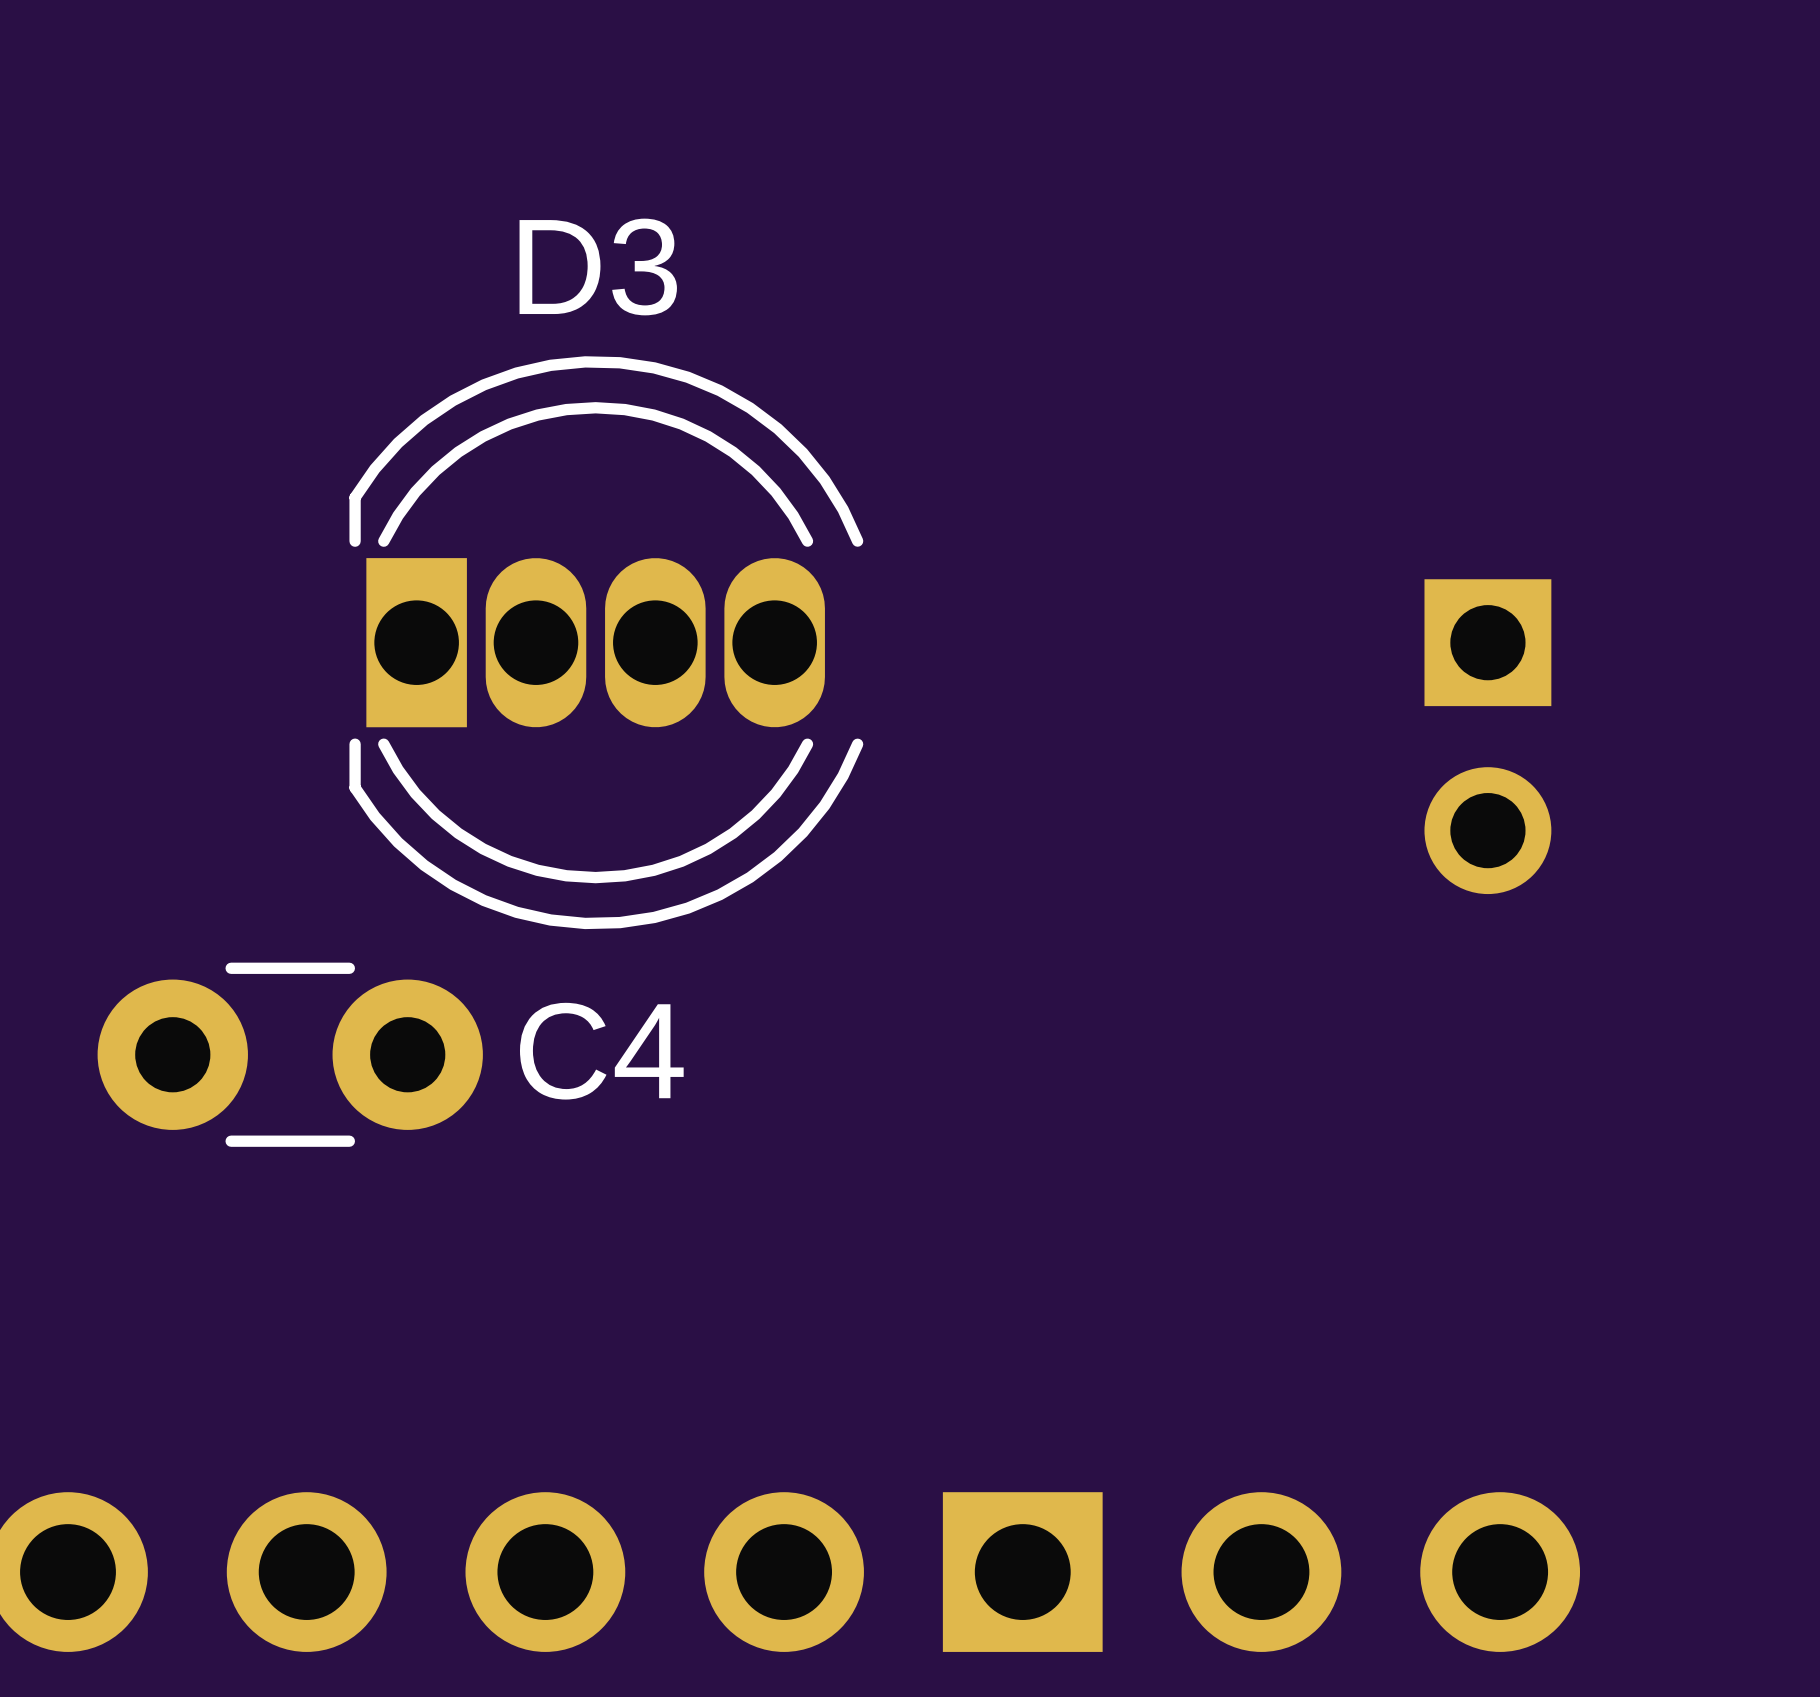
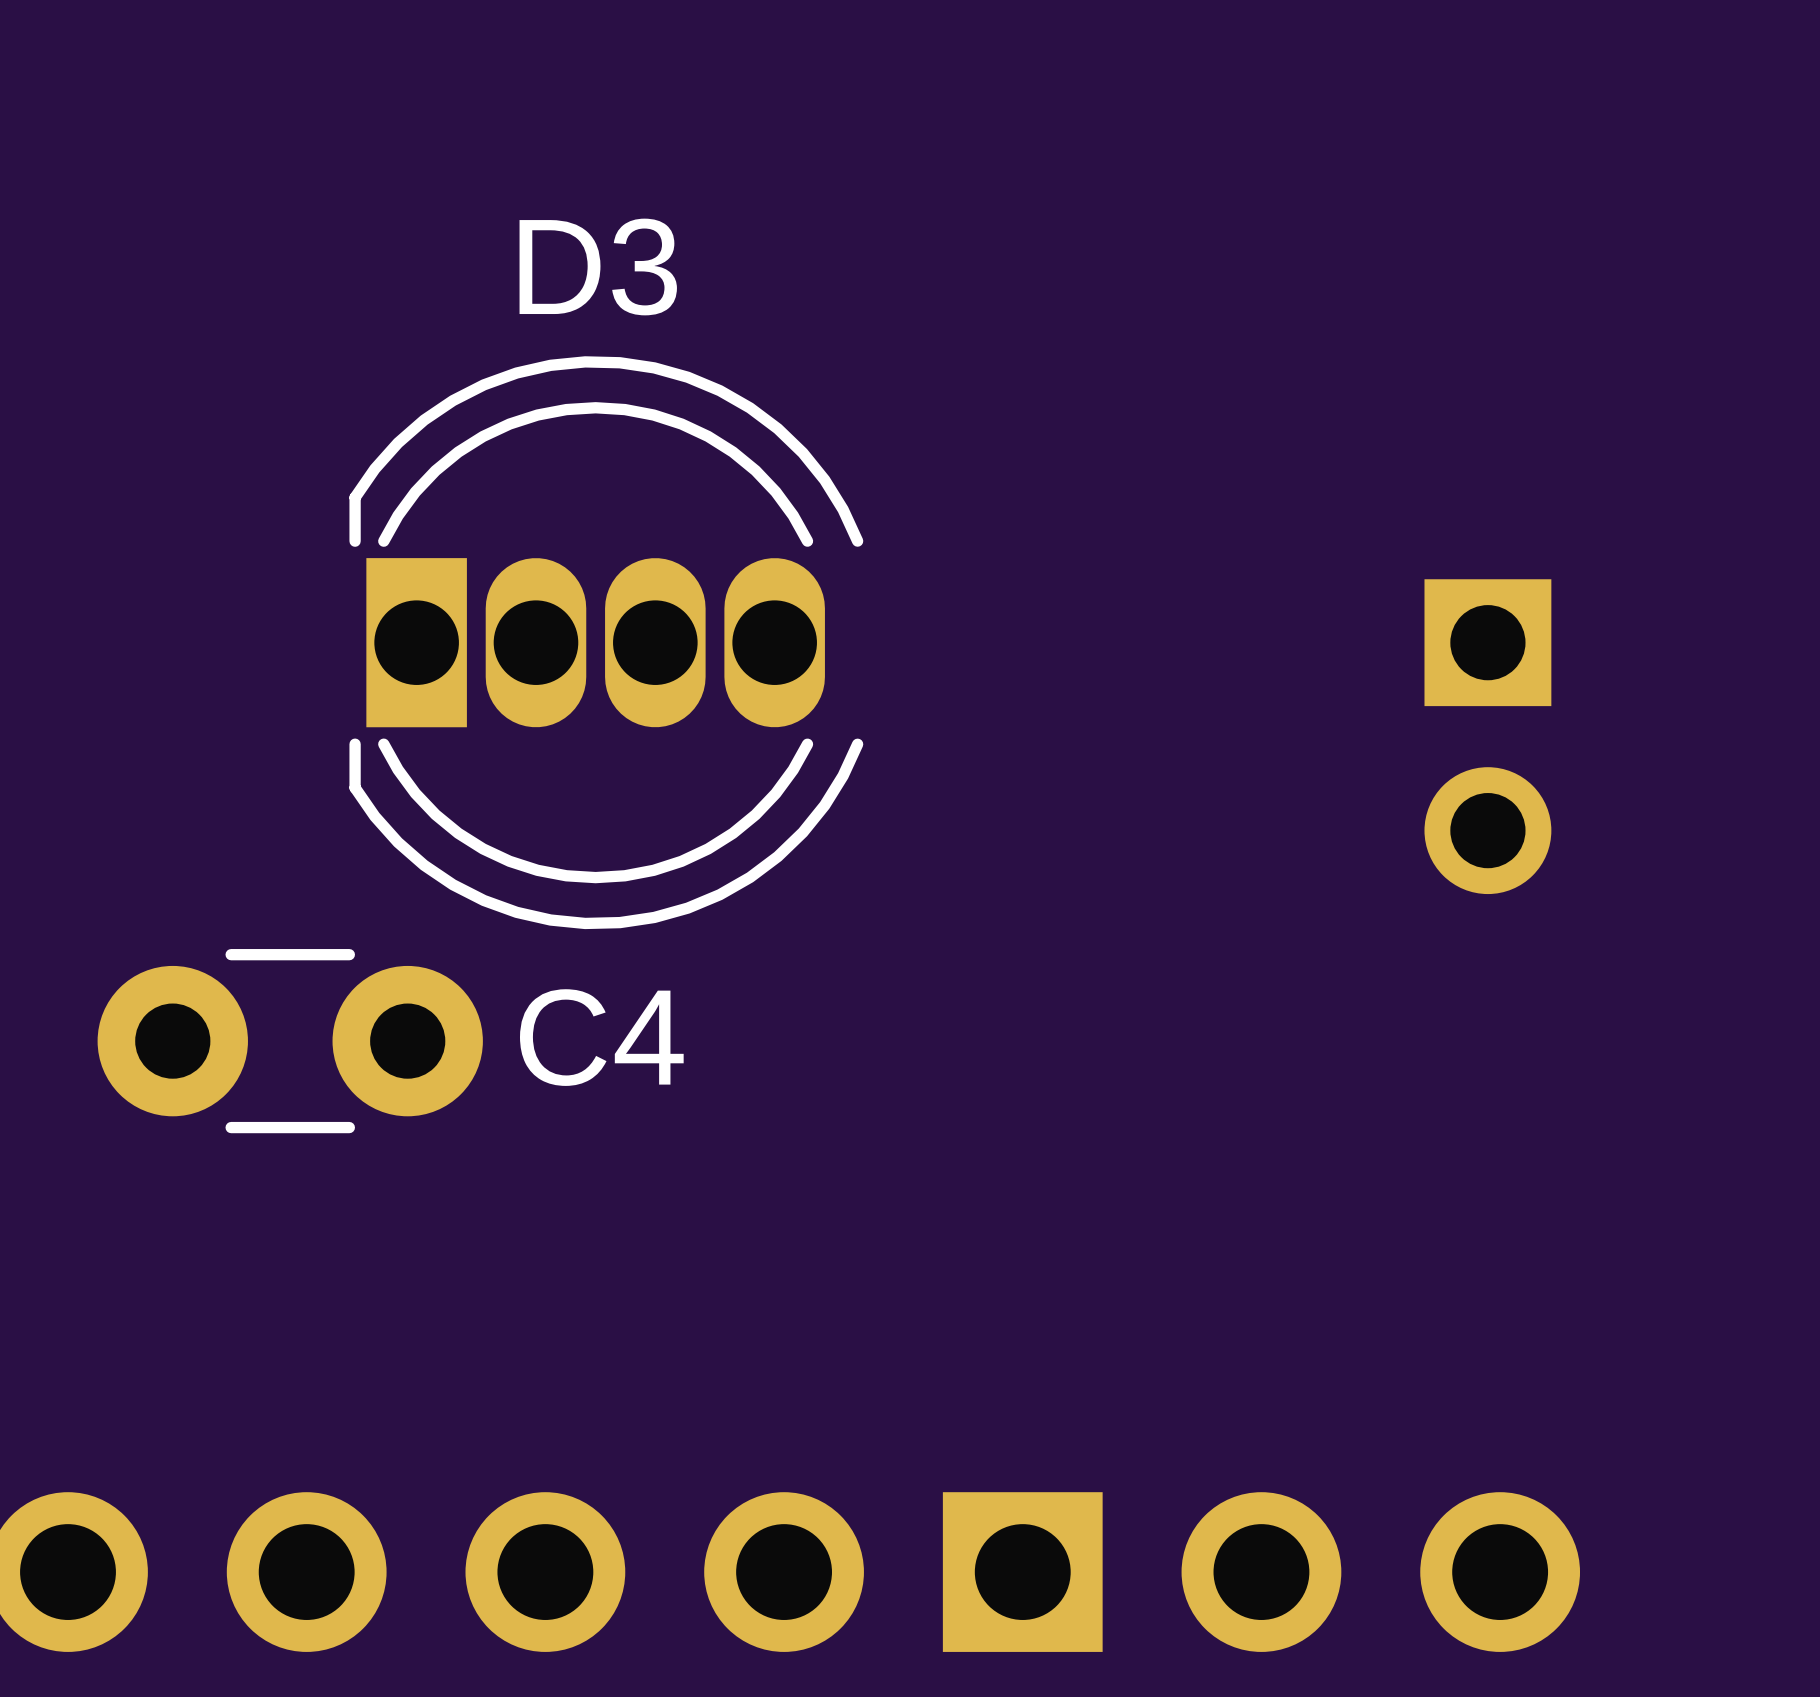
C4 position: (290, 1054) -> (290, 1041)

